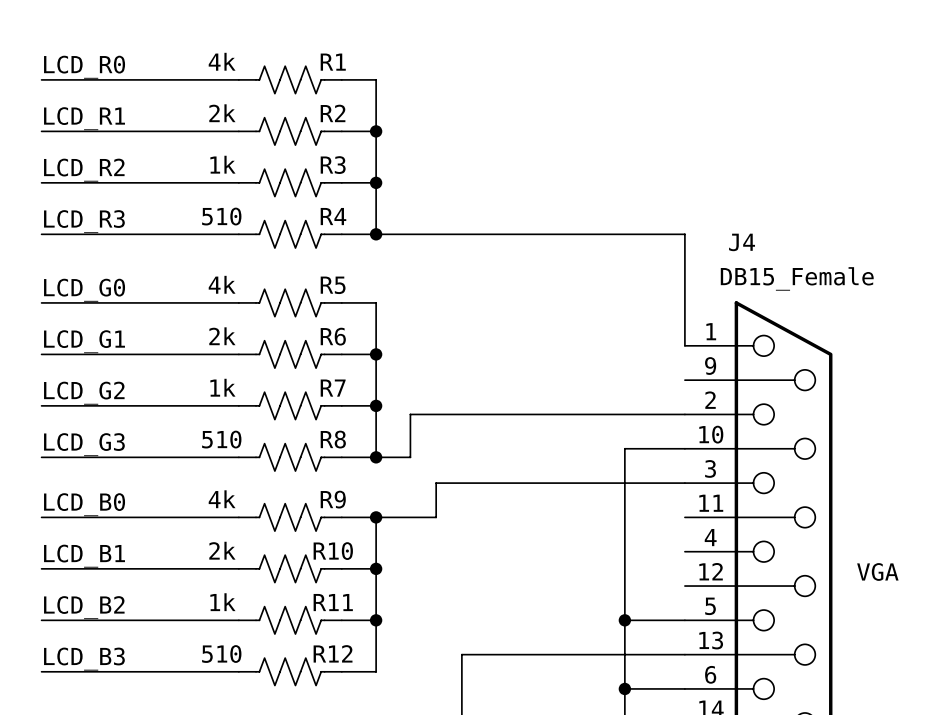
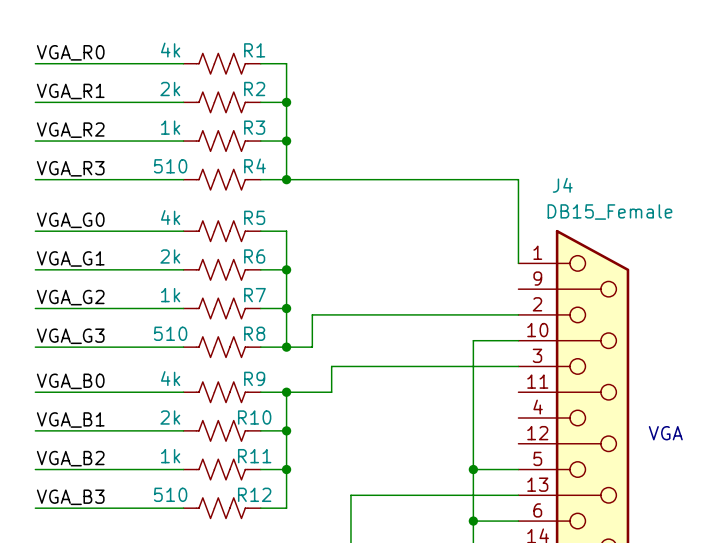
label: LCD_R0 (84, 67) -> VGA_R0 (70, 52)
label: LCD_R1 (84, 118) -> VGA_R1 (70, 91)
label: LCD_R2 (84, 170) -> VGA_R2 (70, 130)
label: LCD_R3 (84, 221) -> VGA_R3 (70, 168)
label: LCD_G0 (84, 290) -> VGA_G0 (70, 220)
label: LCD_G1 (84, 341) -> VGA_G1 (70, 258)
label: LCD_G2 (84, 393) -> VGA_G2 (70, 297)
label: LCD_G3 (84, 444) -> VGA_G3 (70, 336)
label: LCD_B0 (84, 504) -> VGA_B0 (70, 381)
label: LCD_B1 (84, 556) -> VGA_B1 (70, 420)
label: LCD_B2 (84, 607) -> VGA_B2 (70, 458)
label: LCD_B3 (84, 659) -> VGA_B3 (70, 497)

